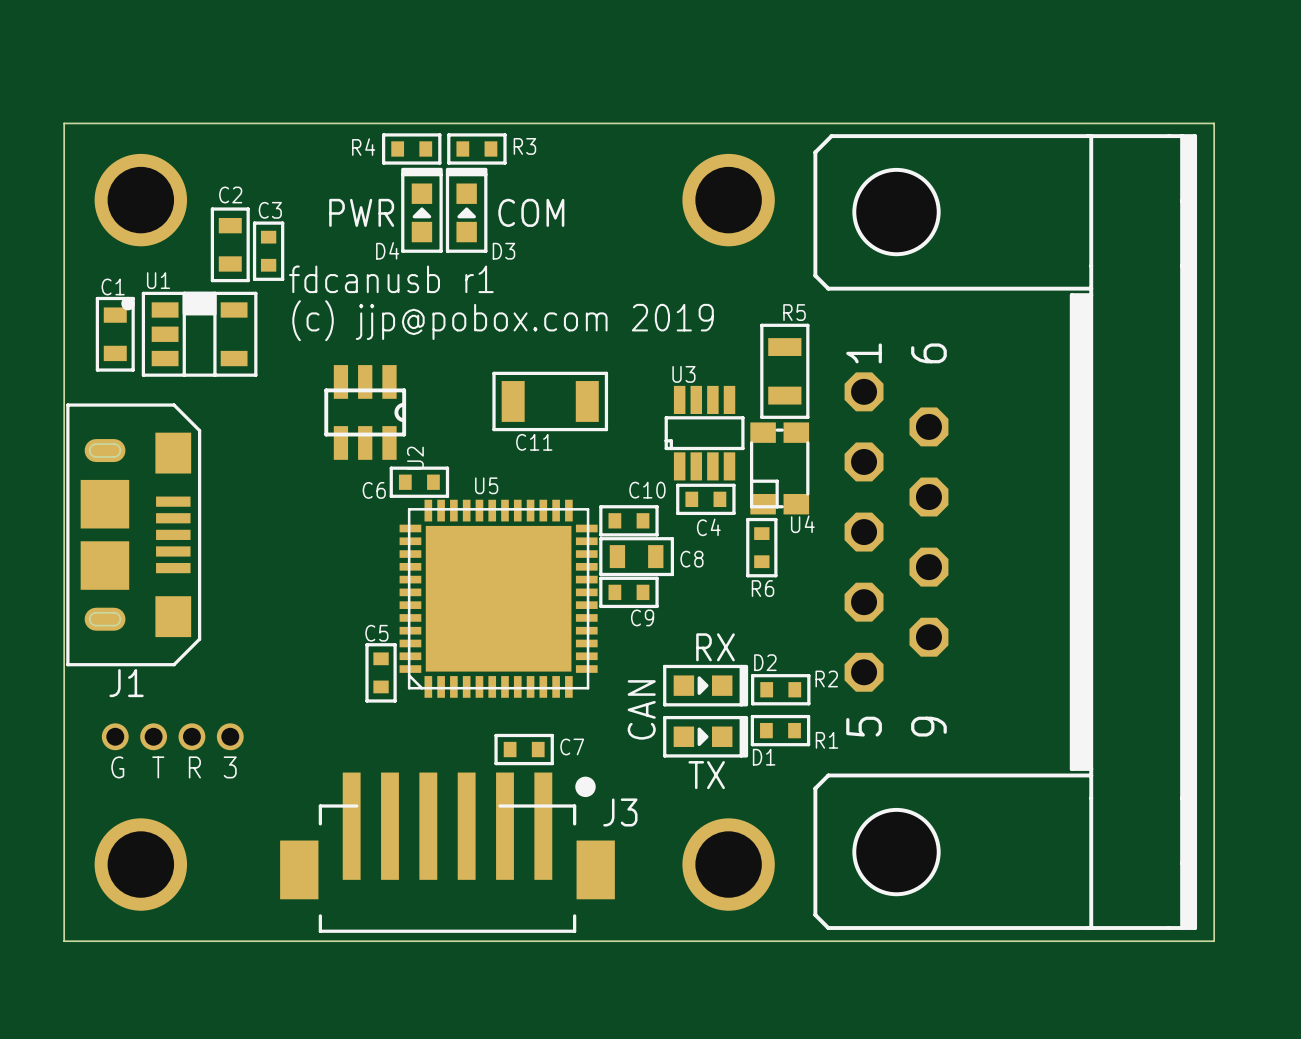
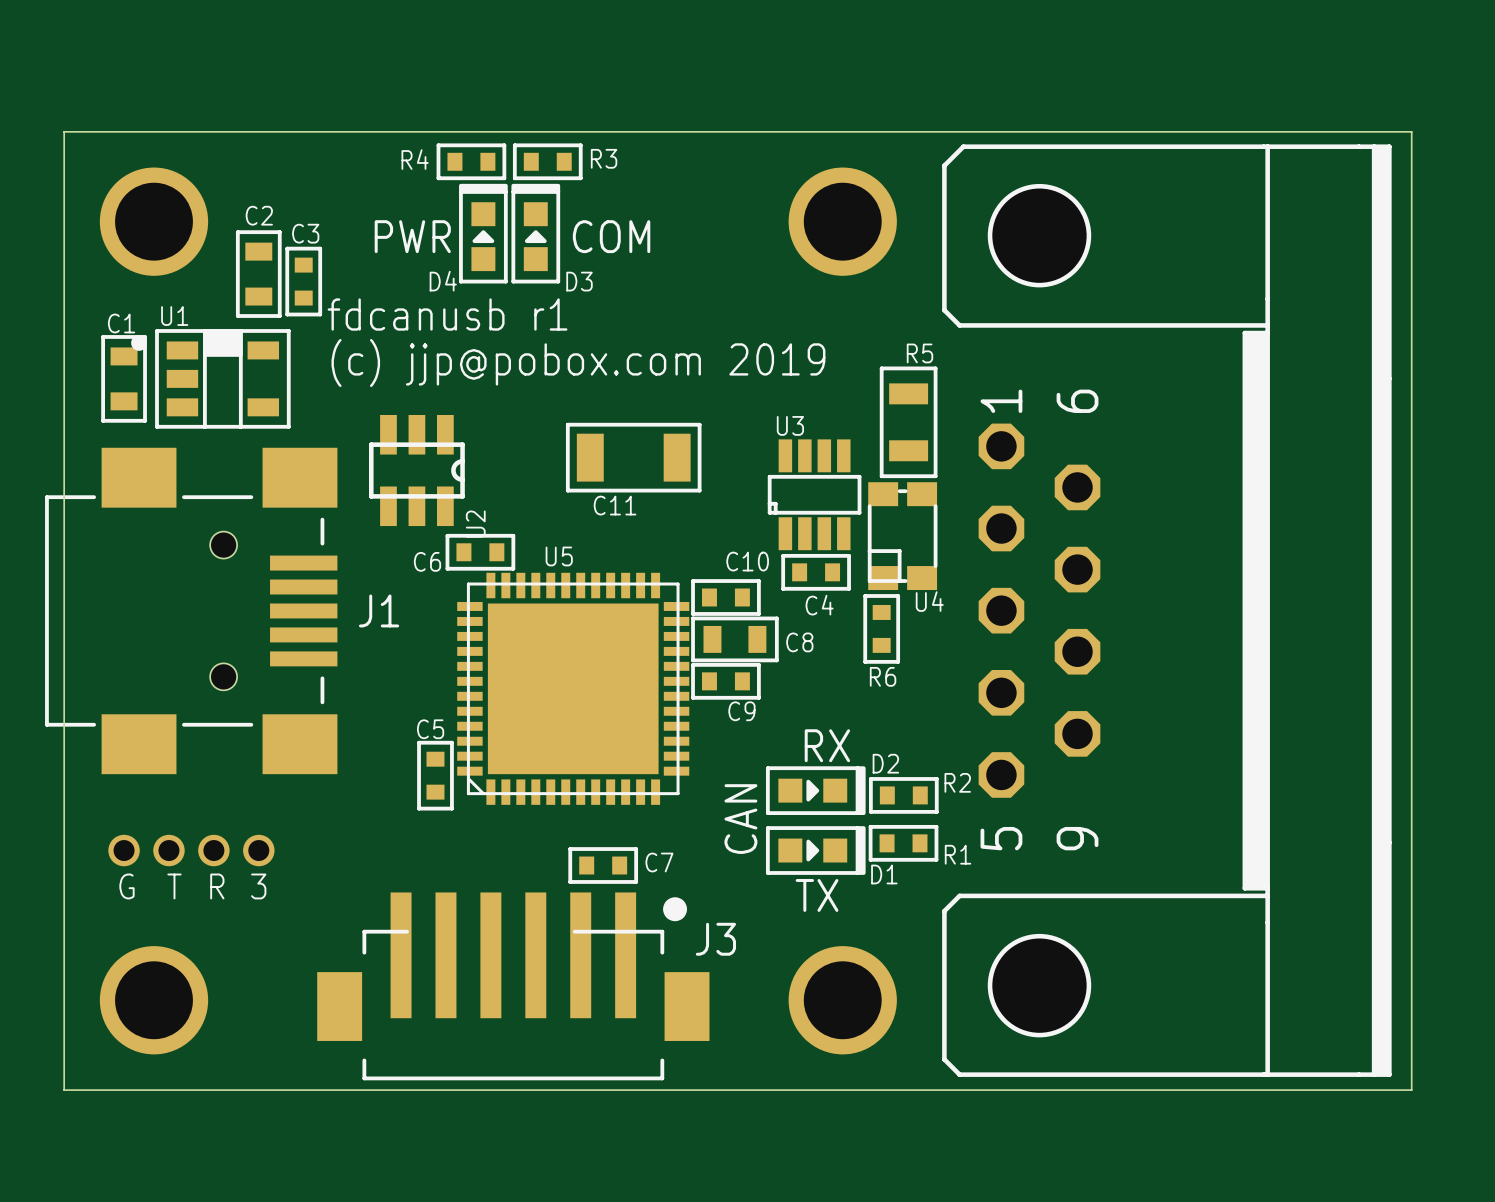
J1 footprint: [66, 403, 202, 667] -> [45, 447, 338, 775]
J1 name position: J1 (126, 683) -> J1 (379, 610)

